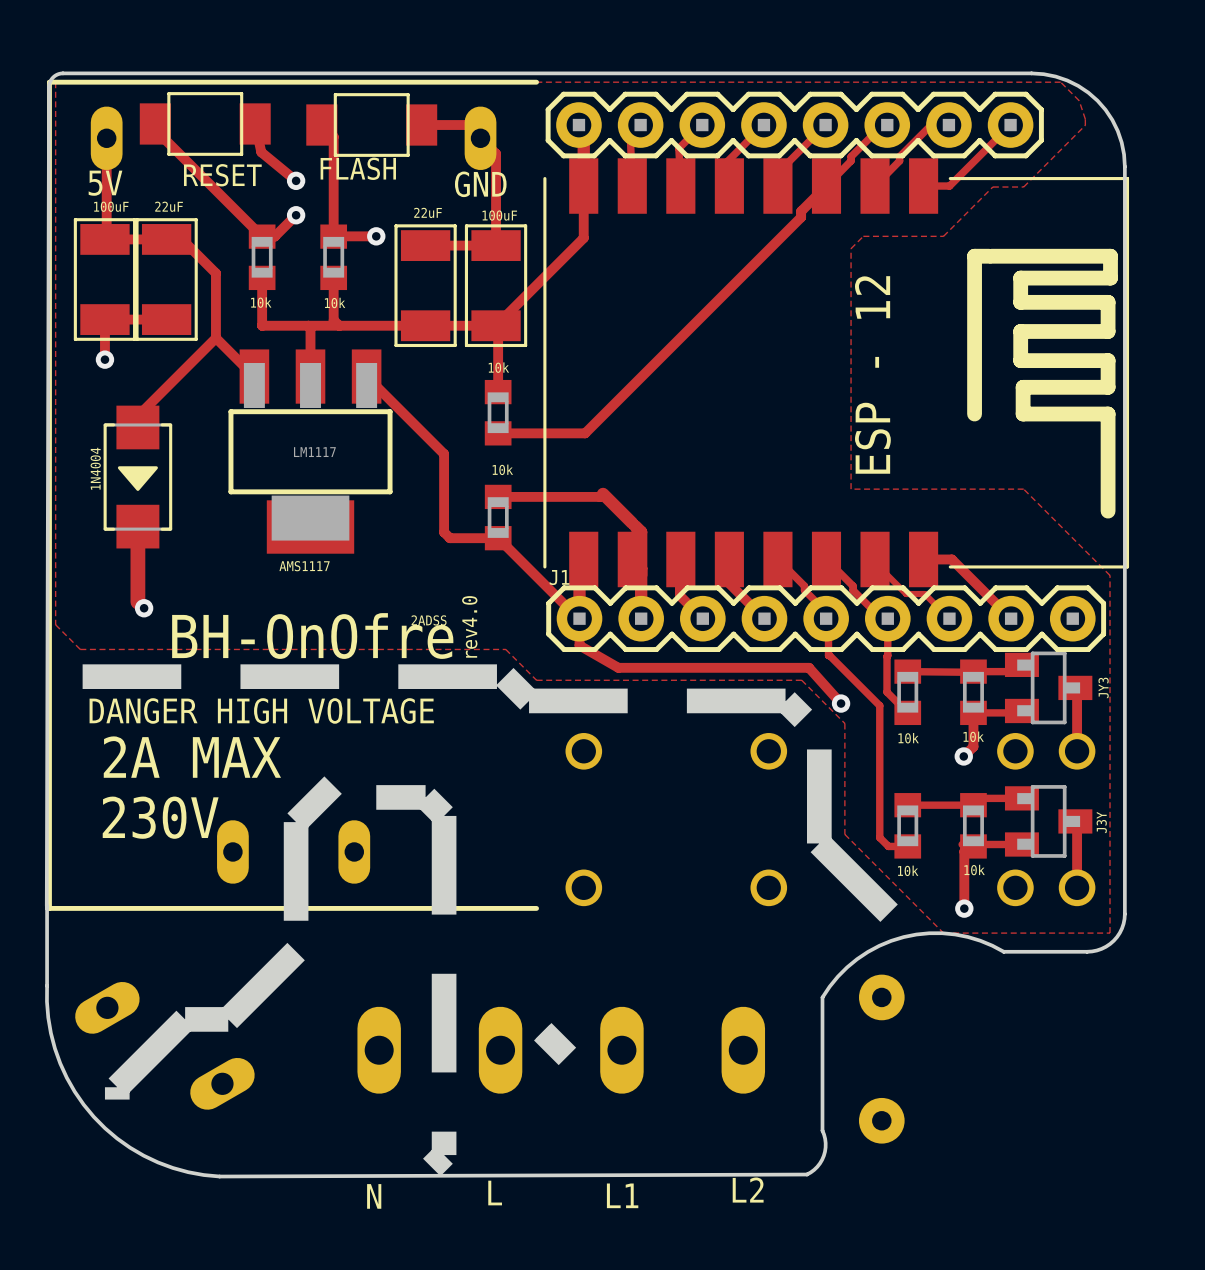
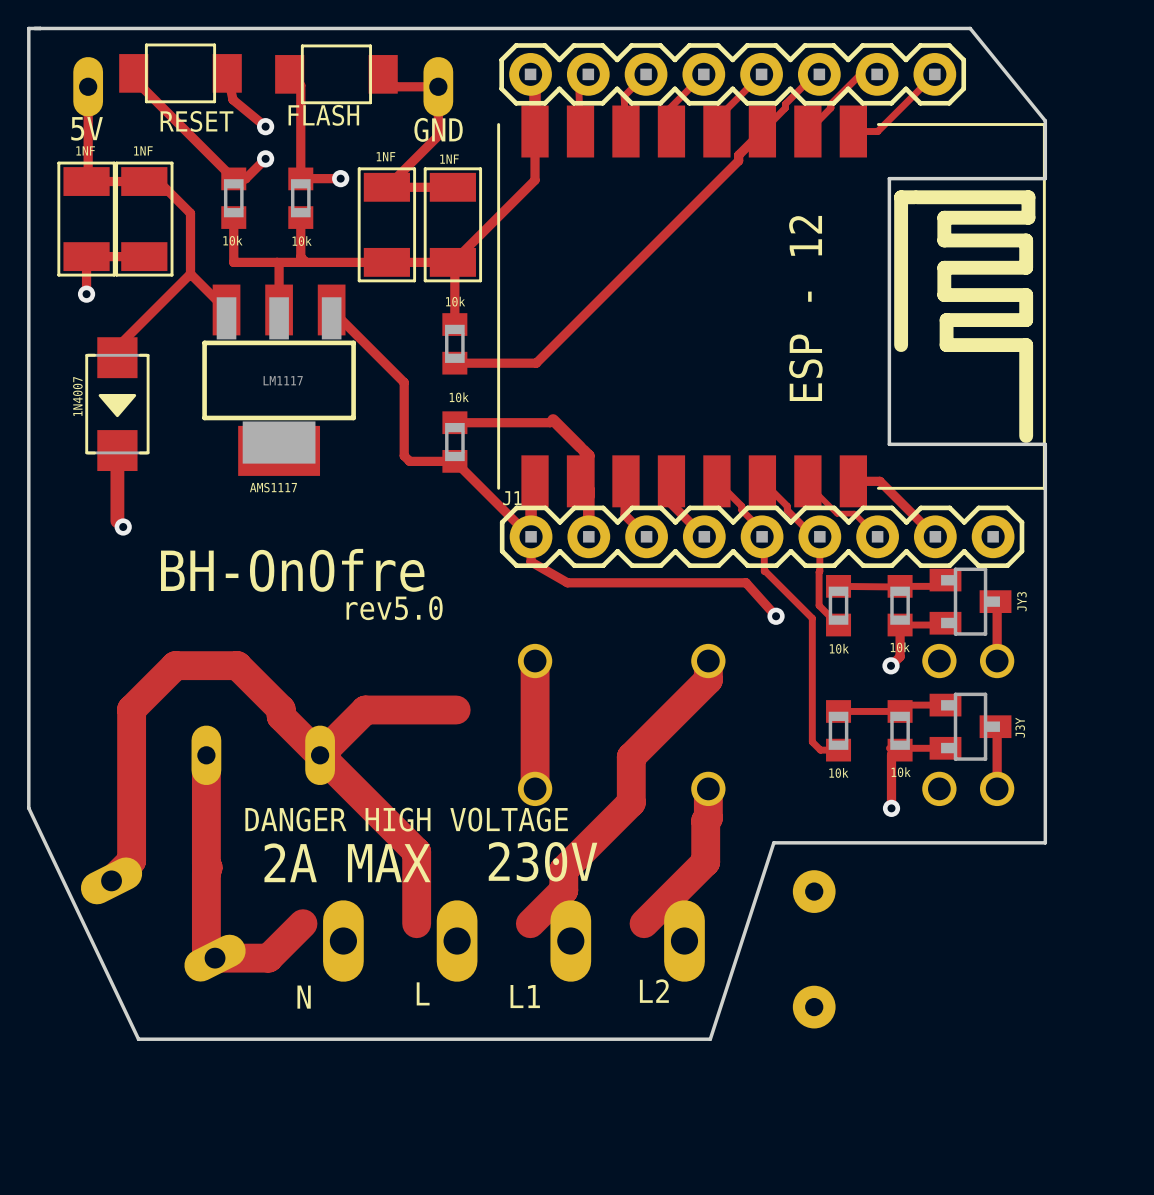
board edge: none -> (28, 28) (970, 28) (1045, 120) (1045, 178) (889, 178) (889, 444) (1045, 444) (1045, 842) (773, 842) (710, 1039) (138, 1039) (28, 808) (28, 28)
zone outline: (55, 82) (55, 624) (80, 649) (505, 649) (536, 680) (801, 680) (844, 723) (844, 834) (943, 933) (1110, 933) (1110, 575) (1023, 489) (851, 489) (851, 248) (863, 236) (943, 236) (992, 187) (1023, 187) (1085, 125) (1079, 100) (1060, 82) (55, 82) -> none
line: (536, 82) (49, 82) (49, 908) (536, 908) -> none
track: (421, 125) (467, 125) (496, 153) (496, 245) -> (383, 74) (395, 86) (438, 86) (438, 135) (386, 187)
part value: 100uF (111, 206) -> 1NF (85, 150)
part value: 22uF (169, 206) -> 1NF (143, 150)
part value: 22uF (428, 212) -> 1NF (385, 156)
part value: 100uF (499, 215) -> 1NF (449, 159)
part value: 1N4004 (95, 468) -> 1N4007 (77, 396)
text: 2ADSS (429, 620) -> none
text: rev4.0 (469, 626) -> none
text position: BH-OnOfre (312, 636) -> BH-OnOfre (292, 570)
board edge: (82, 676) (504, 676) (529, 700) (785, 700) (803, 718) -> none
text: none -> rev5.0 (394, 608)
text position: DANGER HIGH VOLTAGE (261, 710) -> DANGER HIGH VOLTAGE (406, 819)
board edge: (819, 749) (819, 843) (930, 954) -> none
track: none -> (535, 661) (535, 788)
track: none -> (708, 661) (708, 679) (631, 756) (631, 802) (563, 870) (563, 890) (530, 923)
text position: 2A MAX (192, 757) -> 2A MAX (347, 862)
board edge: (333, 785) (296, 822) (296, 951) (228, 1019) (185, 1019) (117, 1087) (117, 1099) -> none
board edge: (376, 797) (425, 797) (444, 815) (444, 1155) (431, 1167) -> none
track: none -> (456, 710) (365, 710) (320, 755)
text position: 230V (160, 817) -> 230V (543, 861)
track: none -> (206, 755) (206, 864) (208, 867) (206, 872) (206, 949) (215, 958) (268, 958) (302, 923)
track: none -> (708, 788) (705, 862) (644, 923)
board edge: (47, 906) (47, 985) (46, 1001) (48, 1017) (54, 1048) (66, 1077) (83, 1104) (105, 1128) (143, 1155) (172, 1167) (219, 1176) (807, 1174) (814, 1169) (822, 1159) (825, 1147) (822, 1130) (822, 997) (837, 976) (857, 959) (891, 940) (929, 933) (967, 936) (1003, 951) (1092, 951) (1110, 943) (1119, 932) (1123, 923) (1124, 166) (1121, 142) (1112, 120) (1105, 109) (1088, 92) (1067, 80) (1043, 74) (1031, 73) (62, 73) (54, 76) (49, 87) (46, 906) (47, 906) (47, 906) (47, 907) (47, 907) (47, 907) (47, 907) (47, 908) -> none
track: none -> (111, 880) (131, 860) (131, 709) (175, 665) (237, 665) (281, 709) (281, 716) (416, 851) (416, 923)
part: none -> (163, 919)
part: (164, 1045) -> none
board edge: (561, 1050) (542, 1031) (567, 1056) -> none
text position: L2 (748, 1190) -> L2 (654, 991)
text position: L (495, 1193) -> L (423, 993)
text position: L1 (622, 1195) -> L1 (525, 996)
text position: N (374, 1196) -> N (304, 997)

